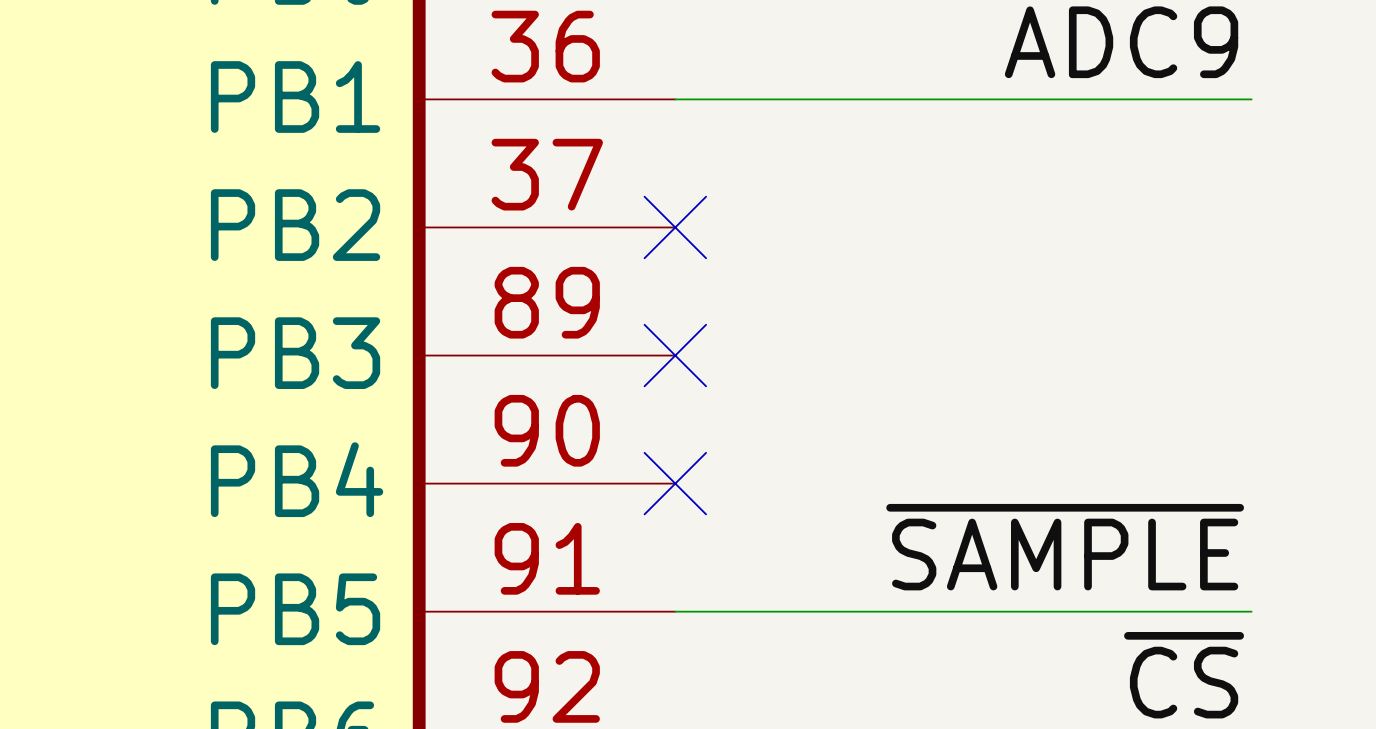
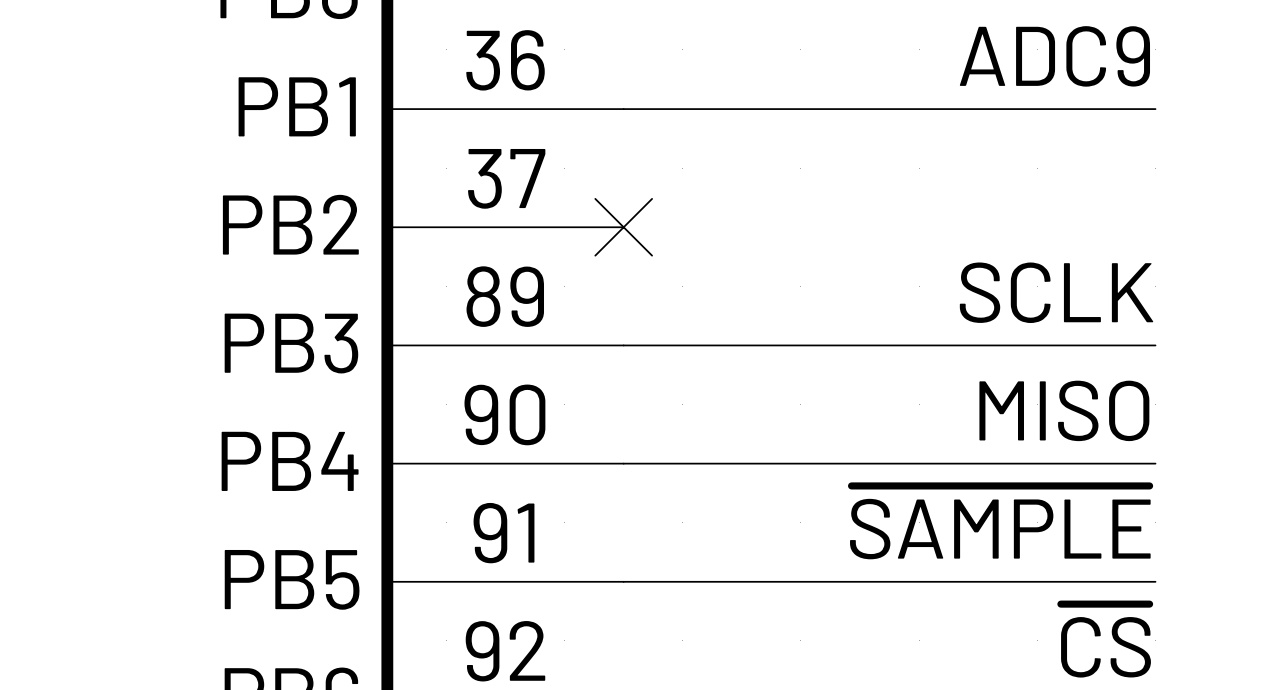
label: none -> SCLK (1056, 292)
wire: none -> (623, 345) (1155, 345)
no-connect mark: (675, 355) -> none
label: none -> MISO (1064, 410)
wire: none -> (623, 463) (1155, 463)
no-connect mark: (675, 483) -> none

